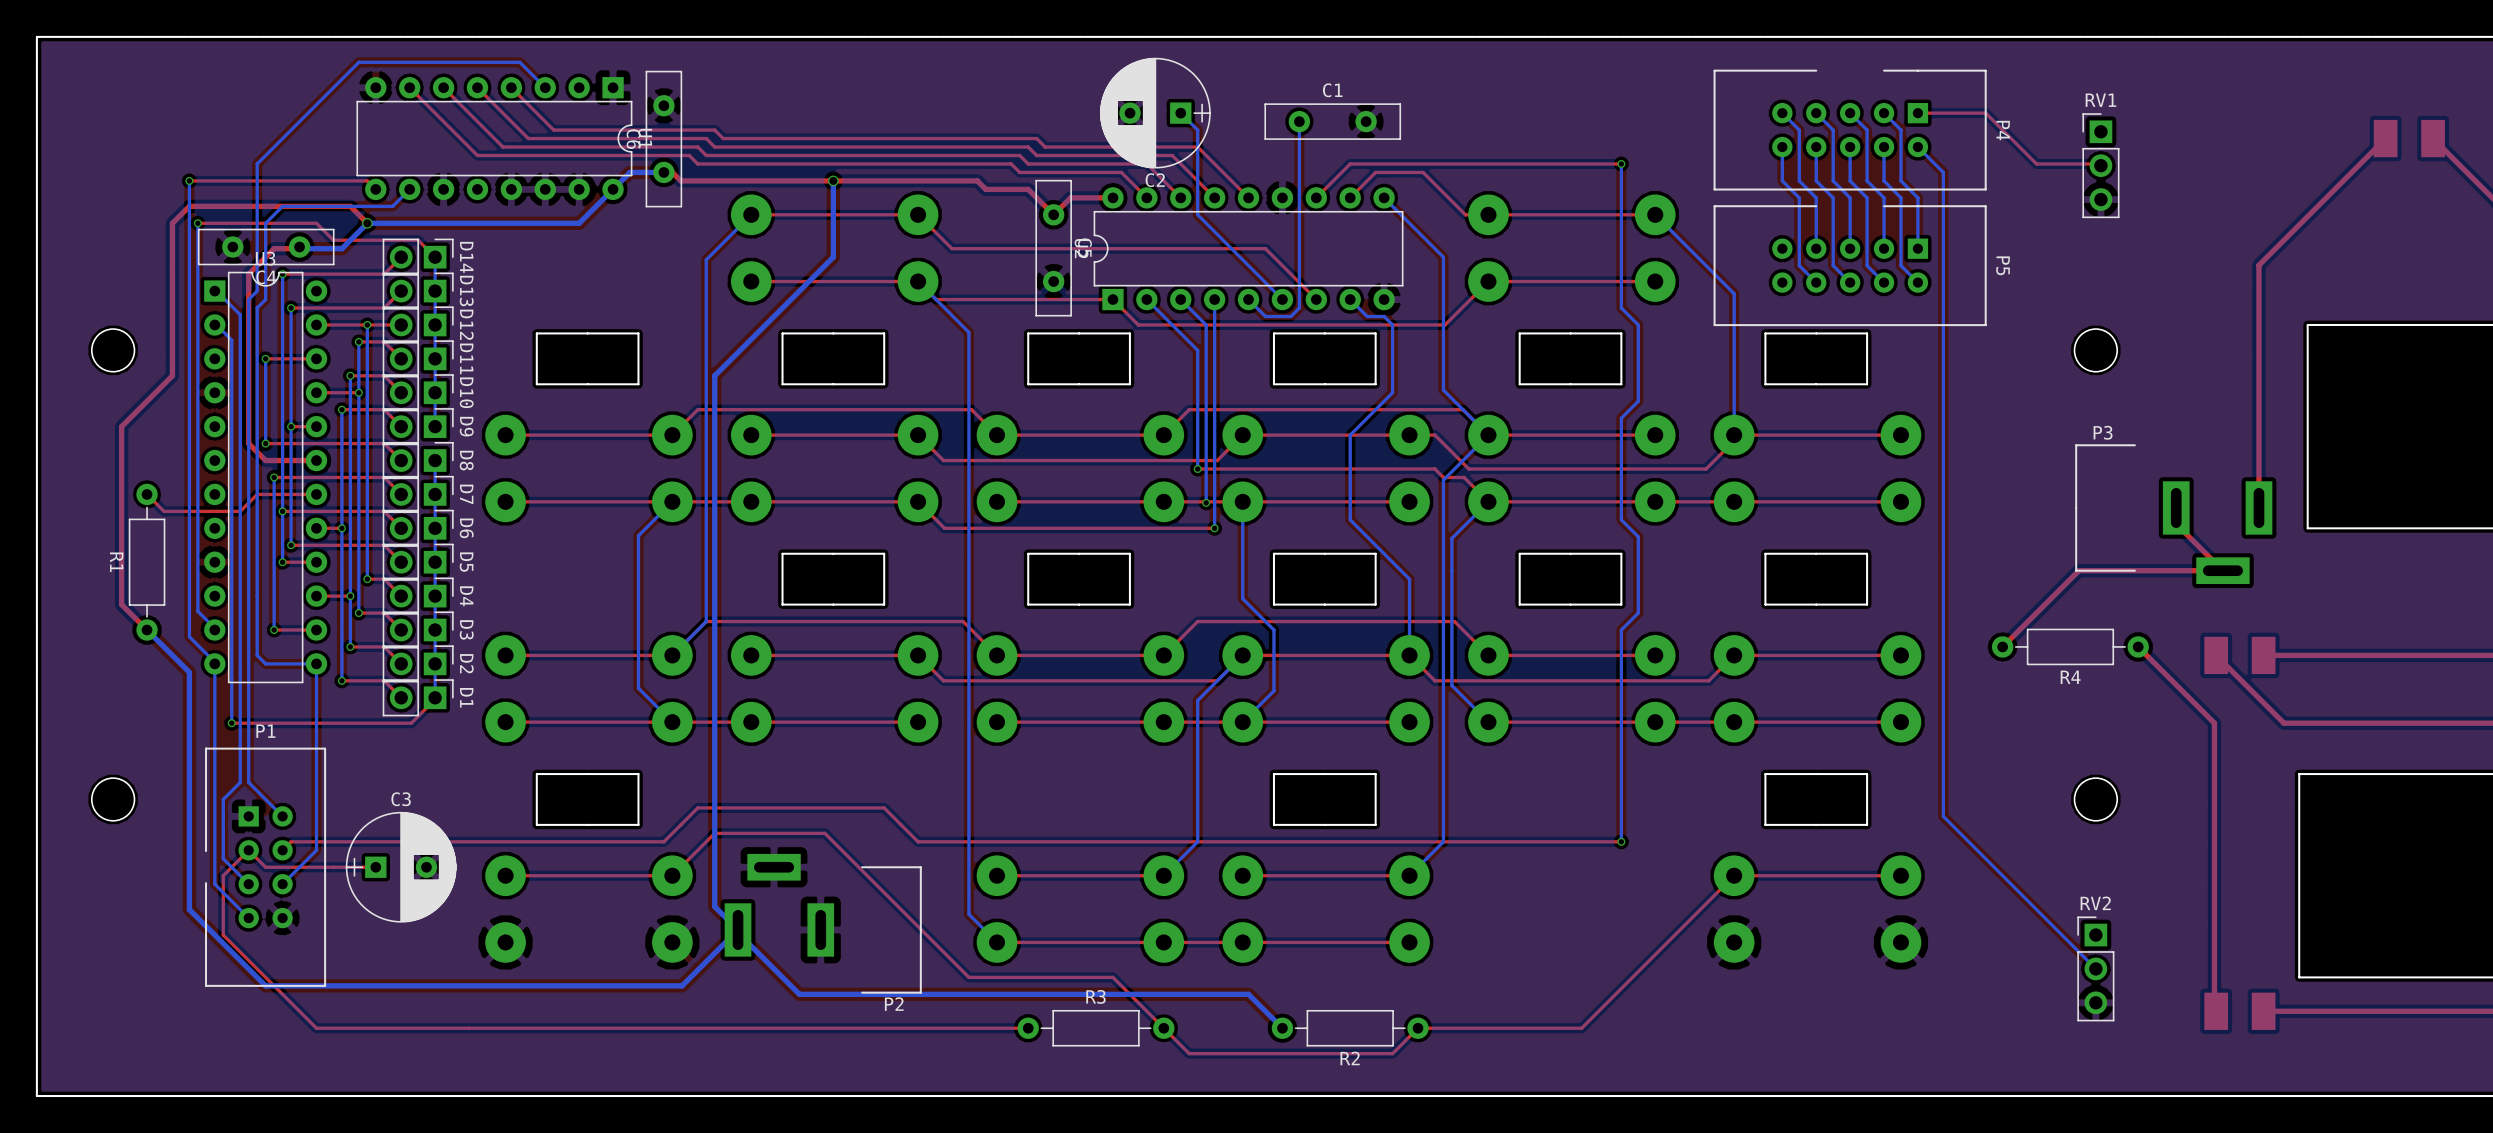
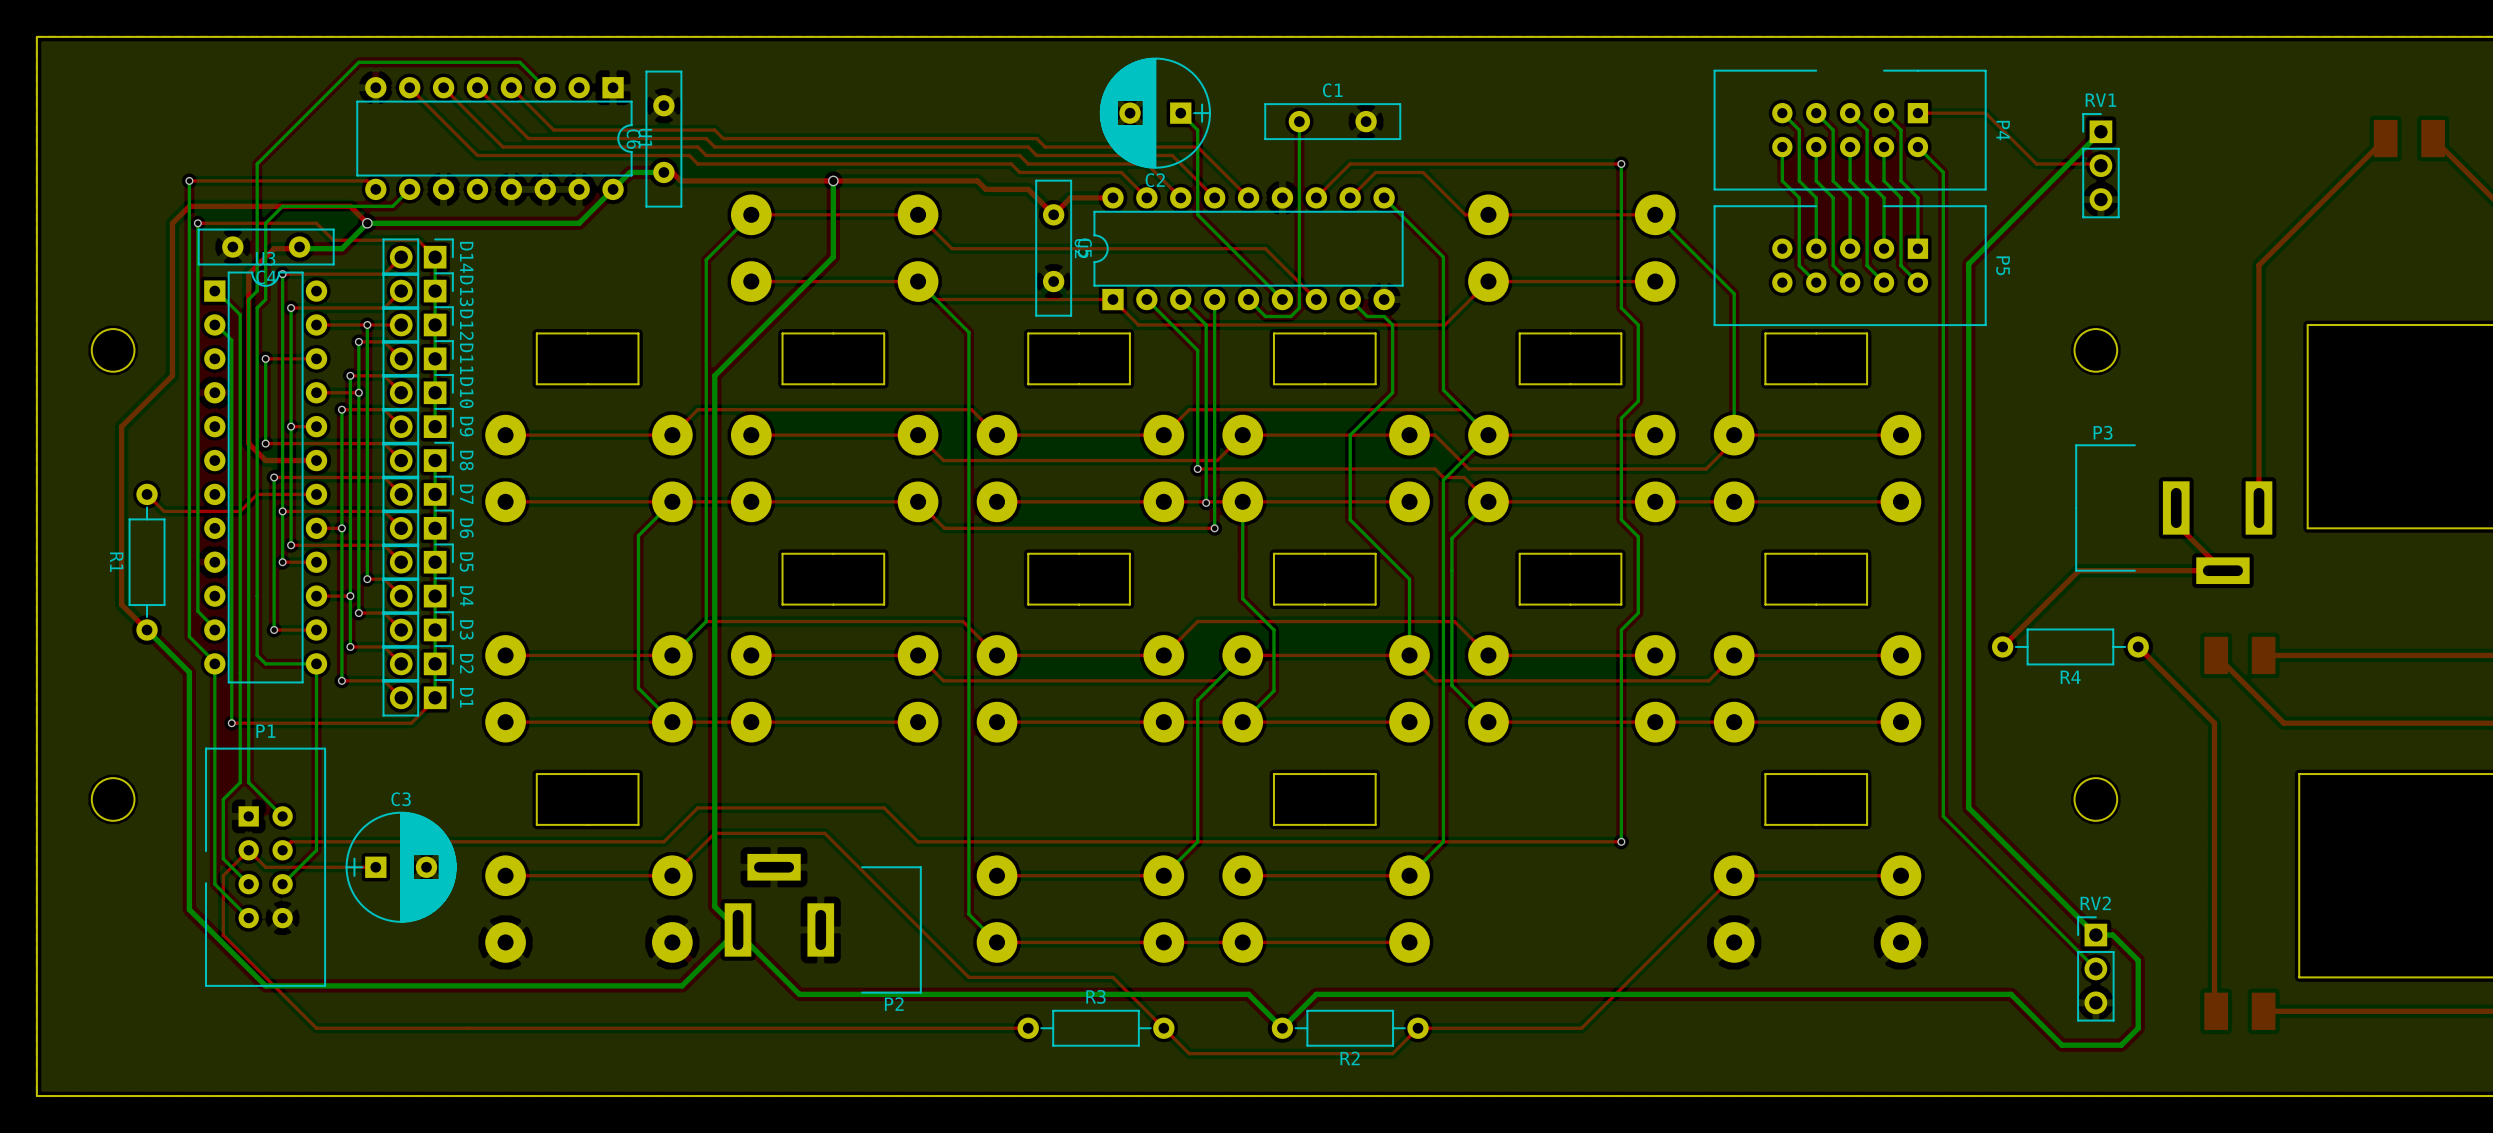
bottom track: none -> (2100, 131) (1968, 263) (1968, 807) (2095, 935) (2112, 935) (2138, 960) (2138, 1028) (2121, 1045) (2061, 1045) (2011, 994) (1316, 994) (1282, 1028)

